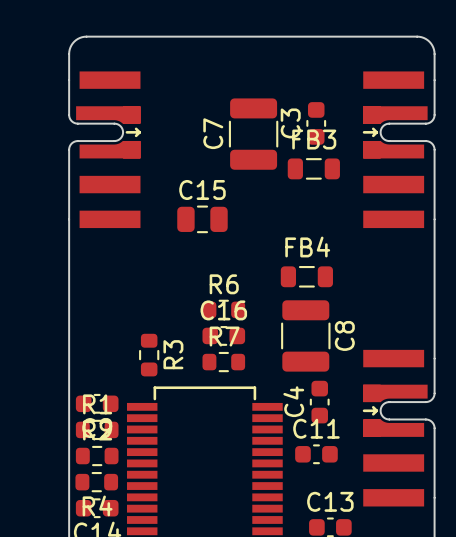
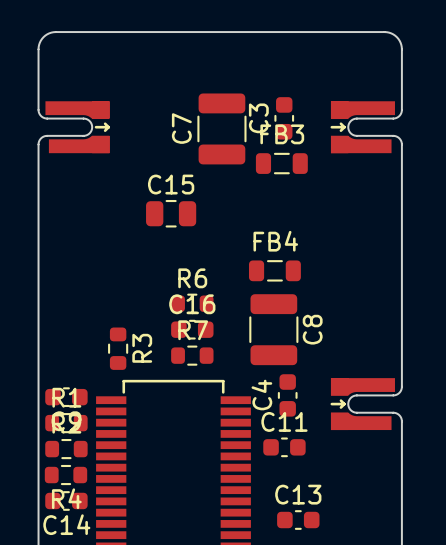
part footprint: [68, 71, 141, 229] -> [38, 101, 110, 154]
part footprint: [362, 71, 436, 229] -> [330, 101, 403, 154]
part footprint: [362, 349, 436, 507] -> [330, 378, 403, 431]

